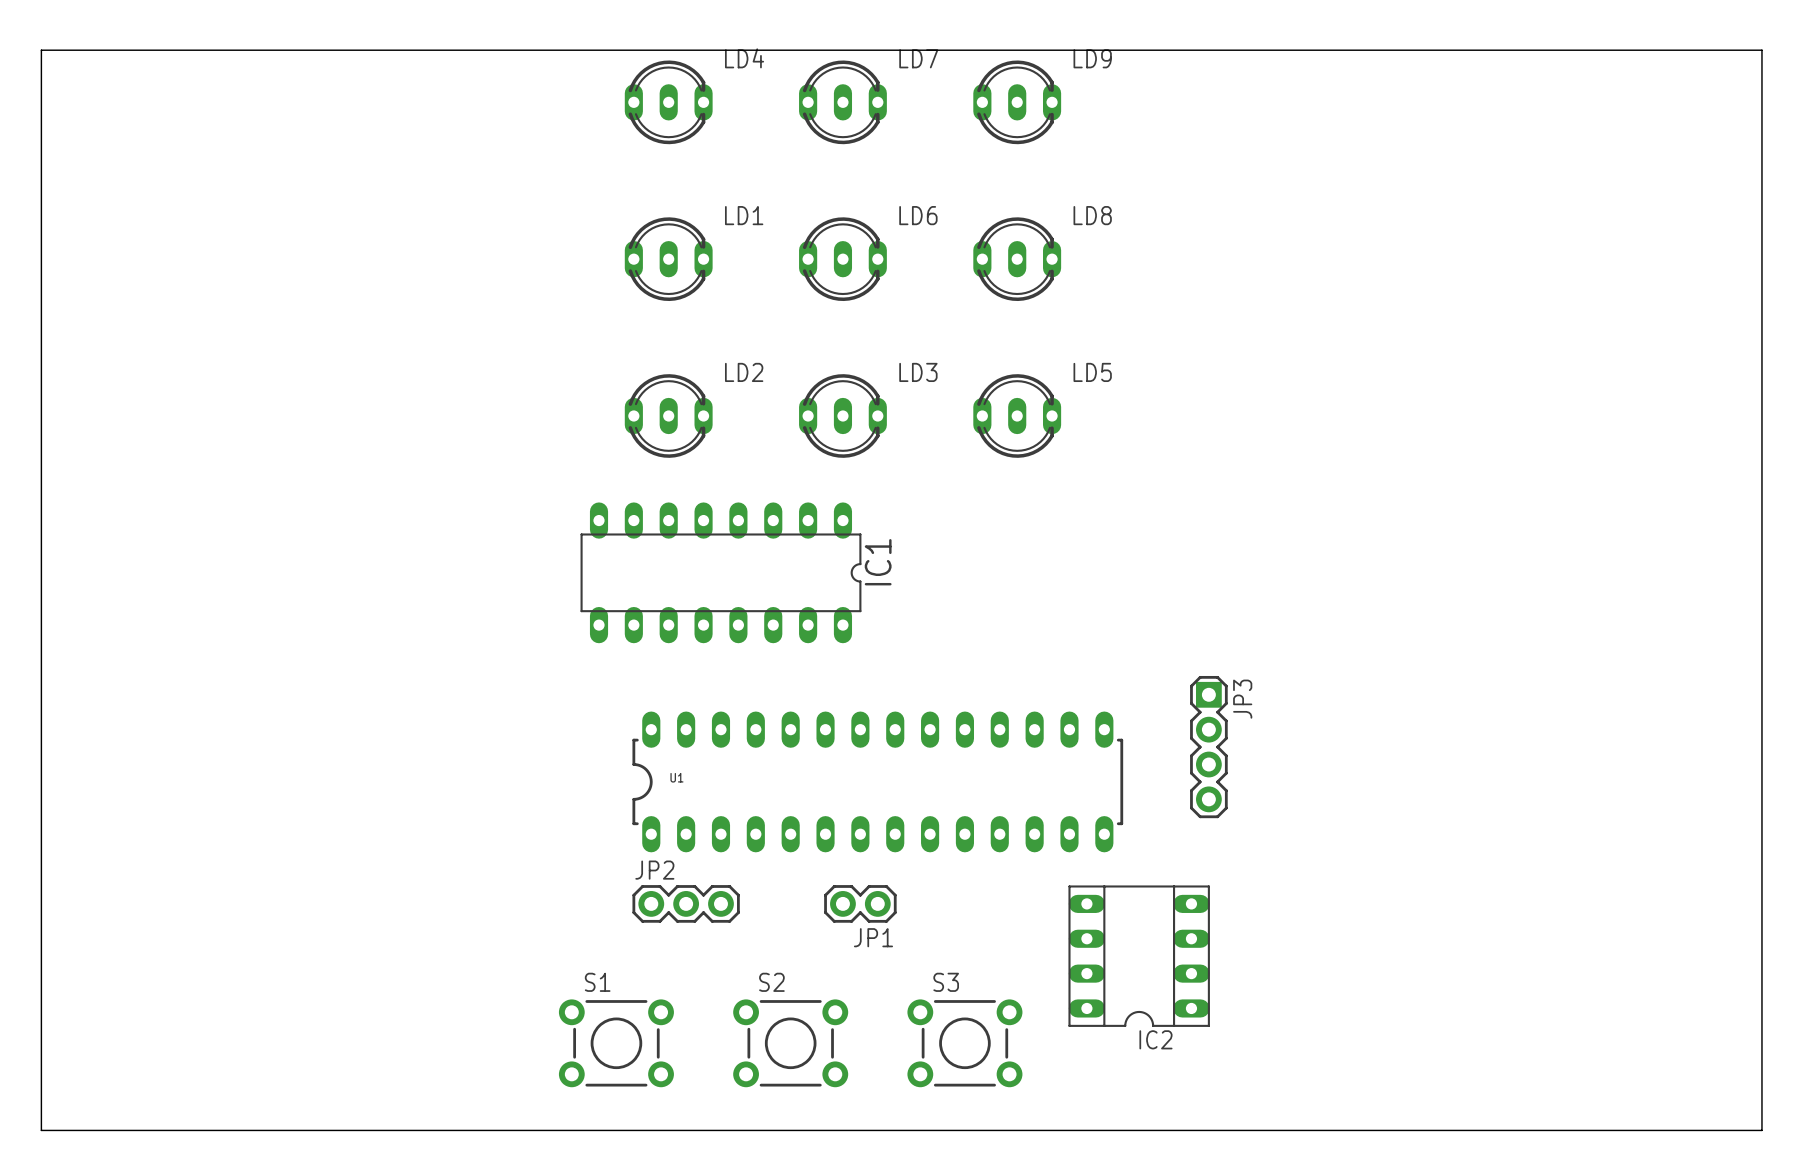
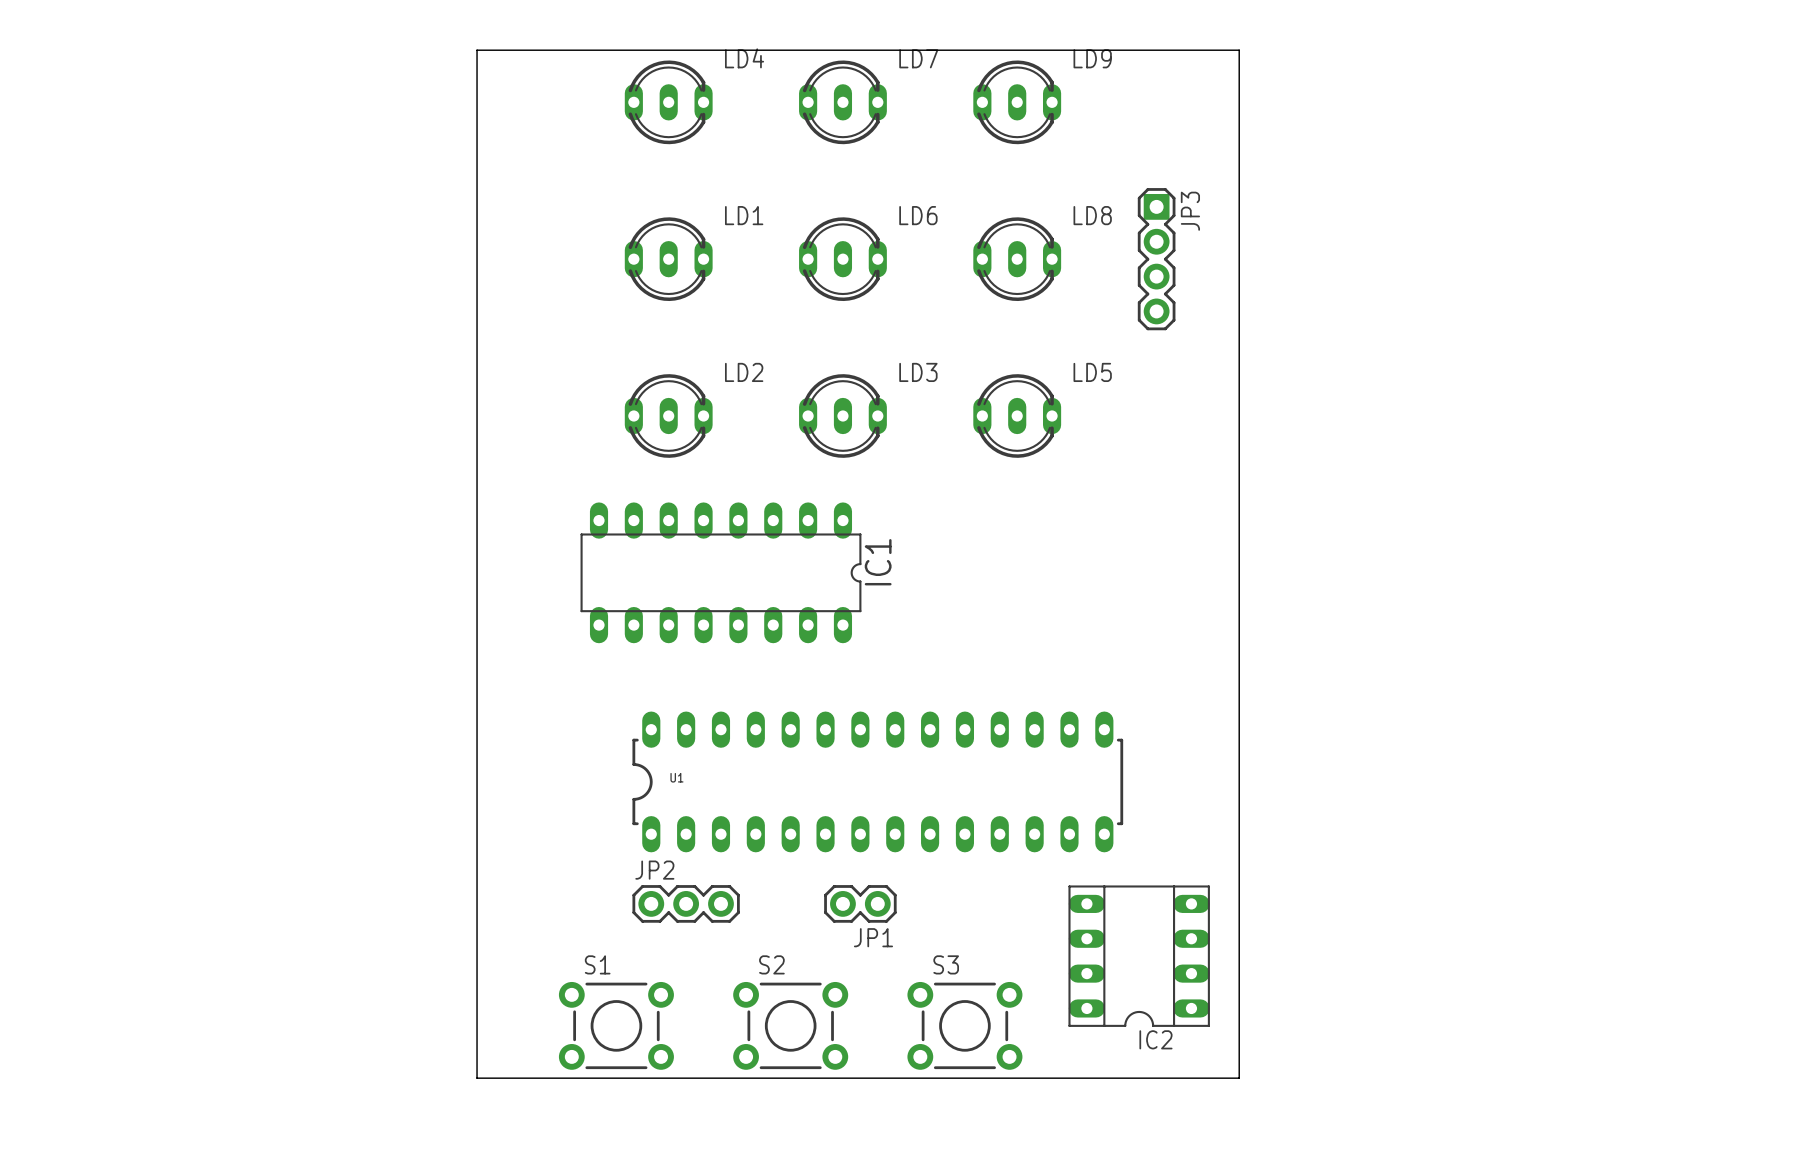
board edge: (477, 50) (41, 50) (41, 1130) (1761, 1130) (1761, 50) (1239, 50) -> (477, 50) (477, 1078) (1239, 1078) (1239, 50)
JP3 position: (1208, 747) -> (1156, 259)
S1 position: (616, 1043) -> (616, 1025)
S2 position: (790, 1043) -> (790, 1025)
S3 position: (964, 1043) -> (964, 1025)

